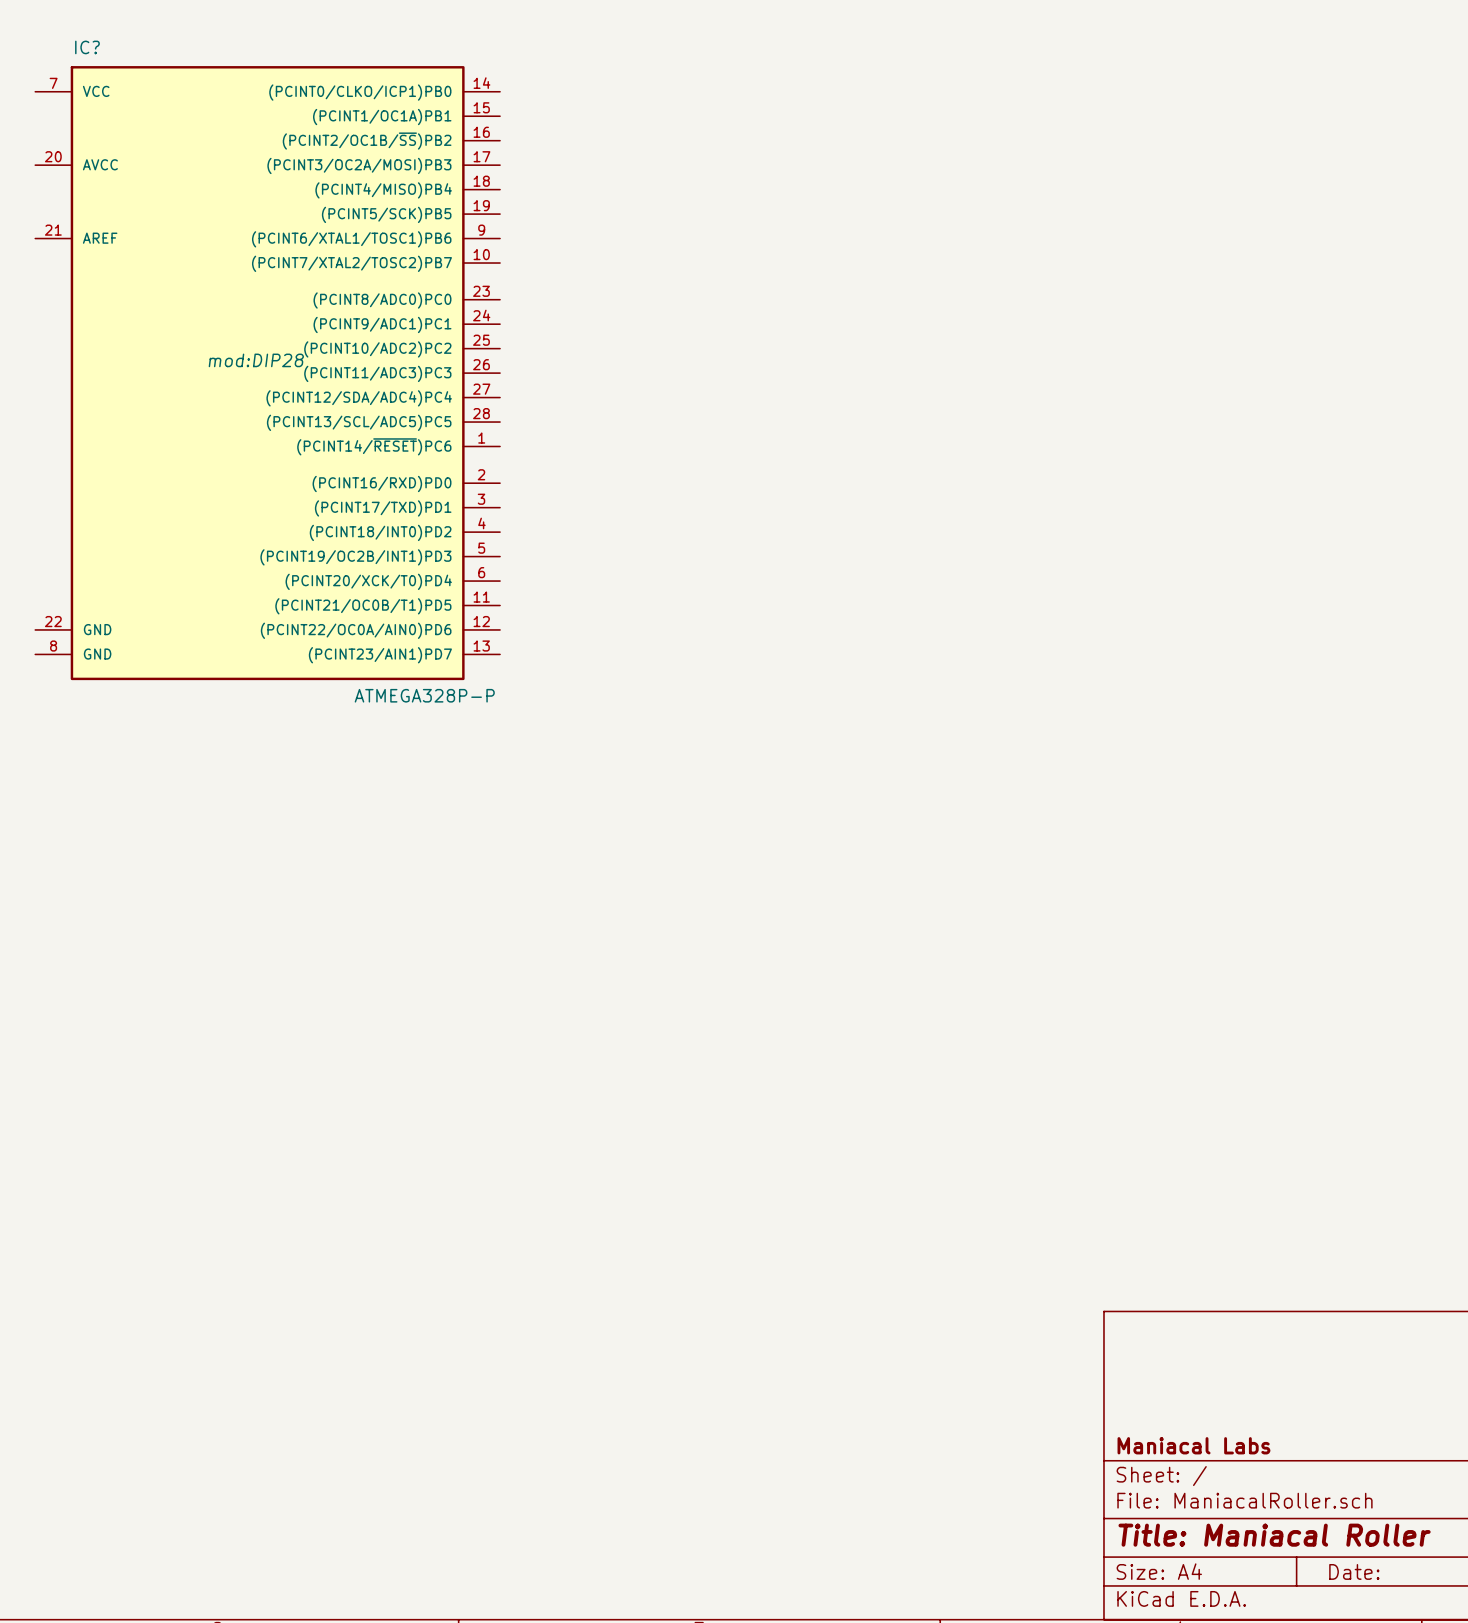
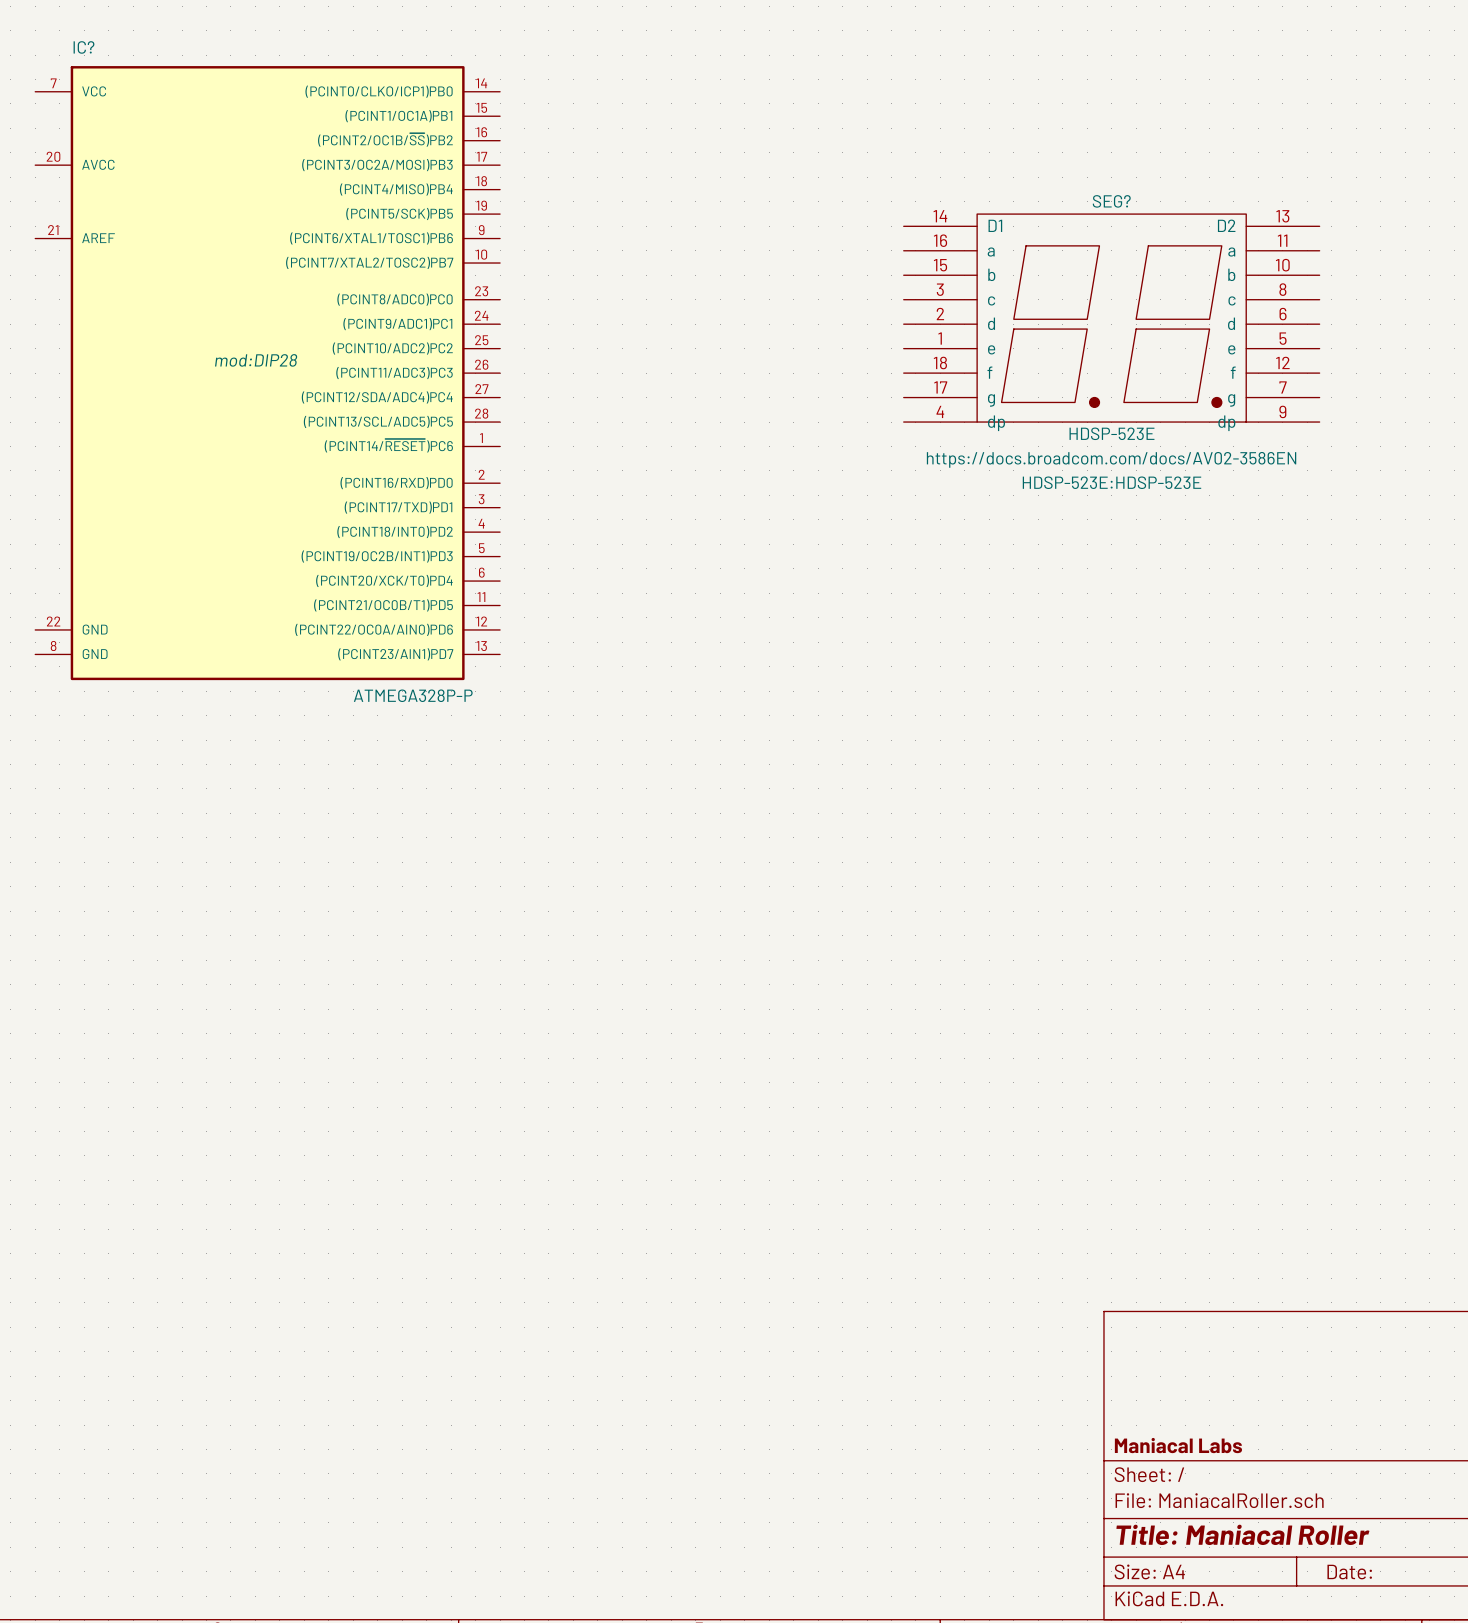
SEG?: none -> HDSP-523E (1111, 318)

